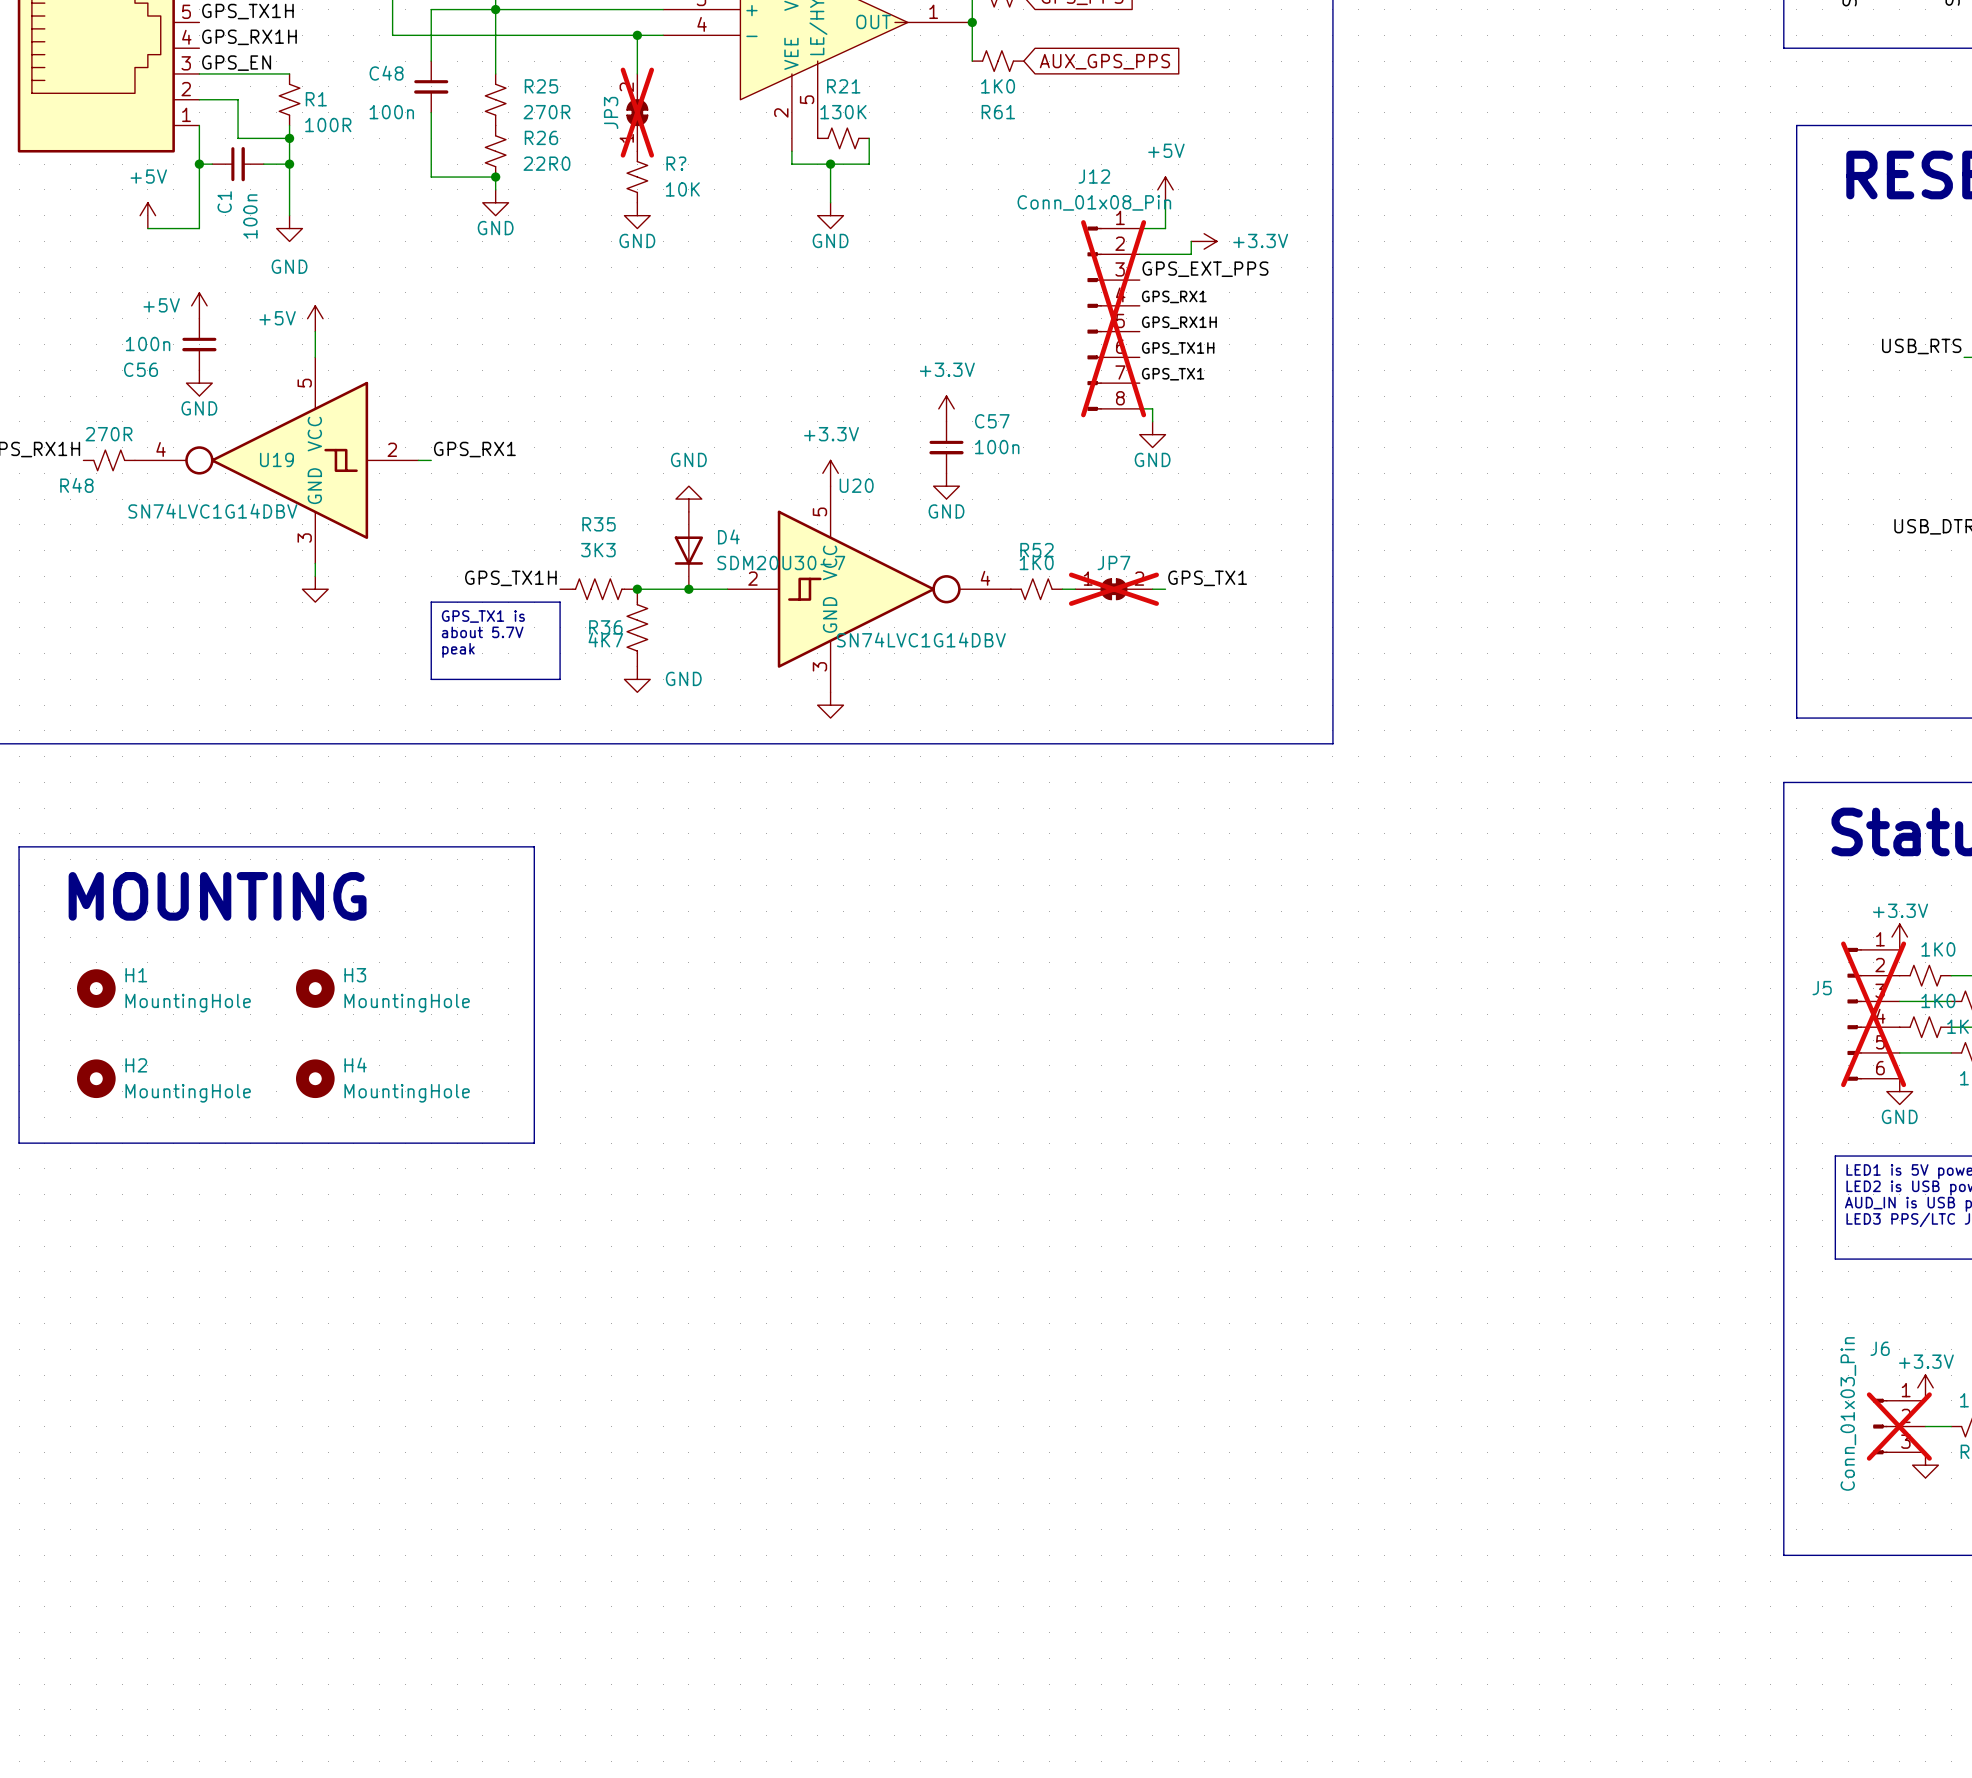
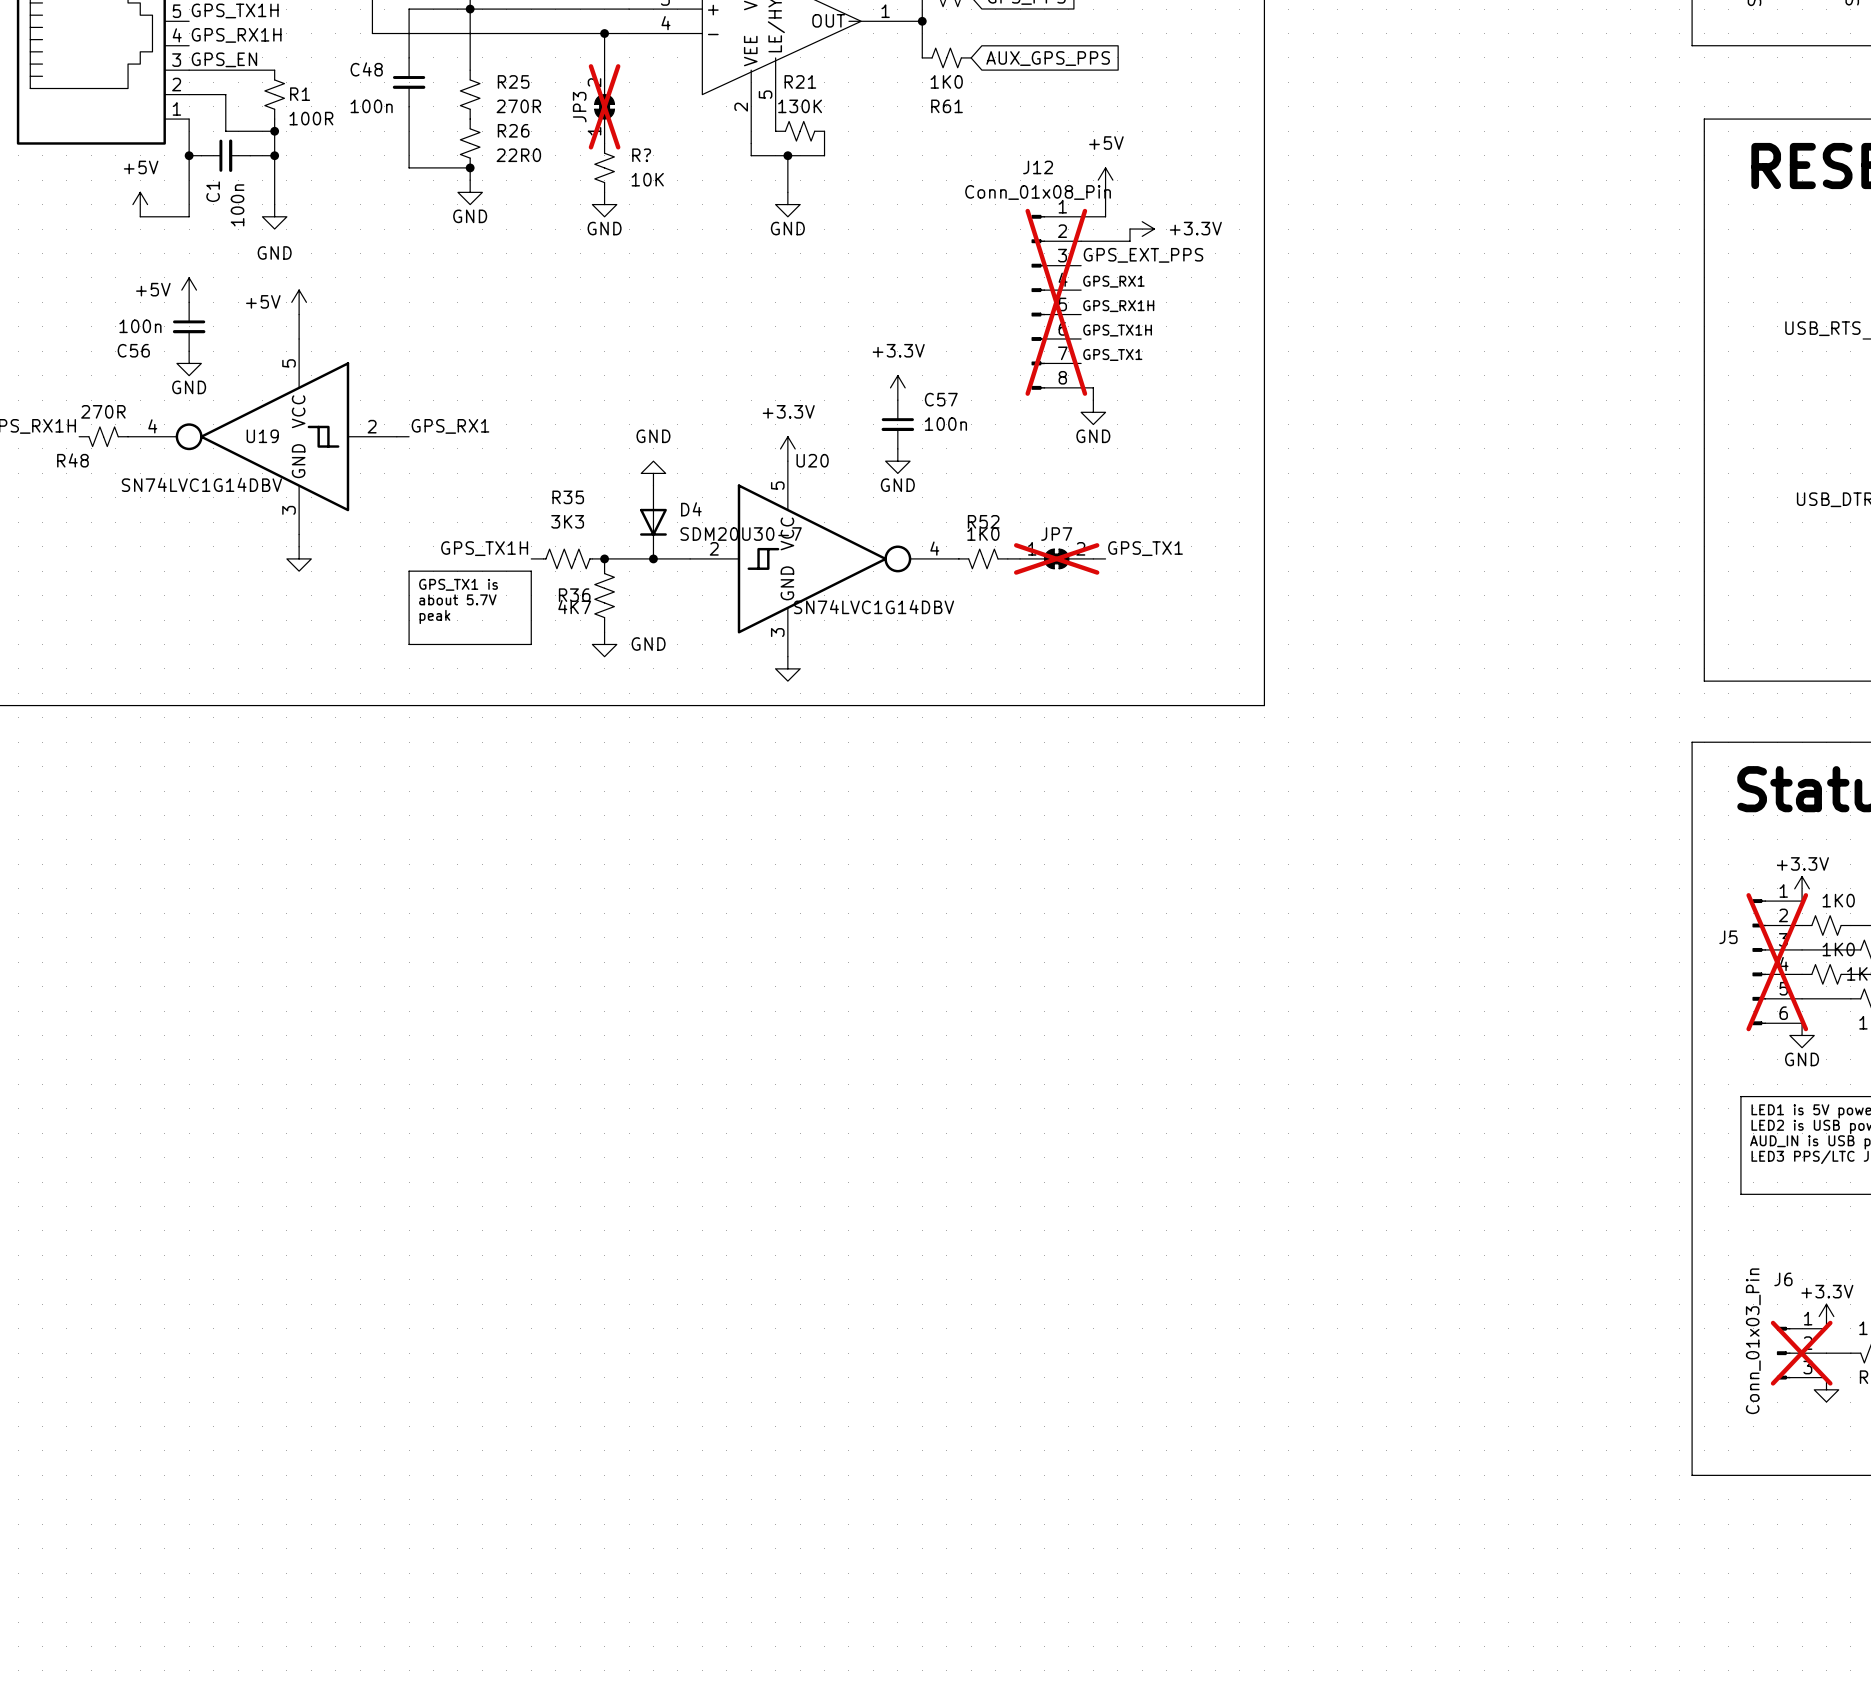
line: (19, 846) (534, 846) (534, 1143) (19, 1143) (19, 846) -> none
text: MOUNTING (217, 896) -> none
H1: MountingHole (96, 988) -> none
H3: MountingHole (315, 988) -> none
H2: MountingHole (96, 1078) -> none
H4: MountingHole (315, 1078) -> none

